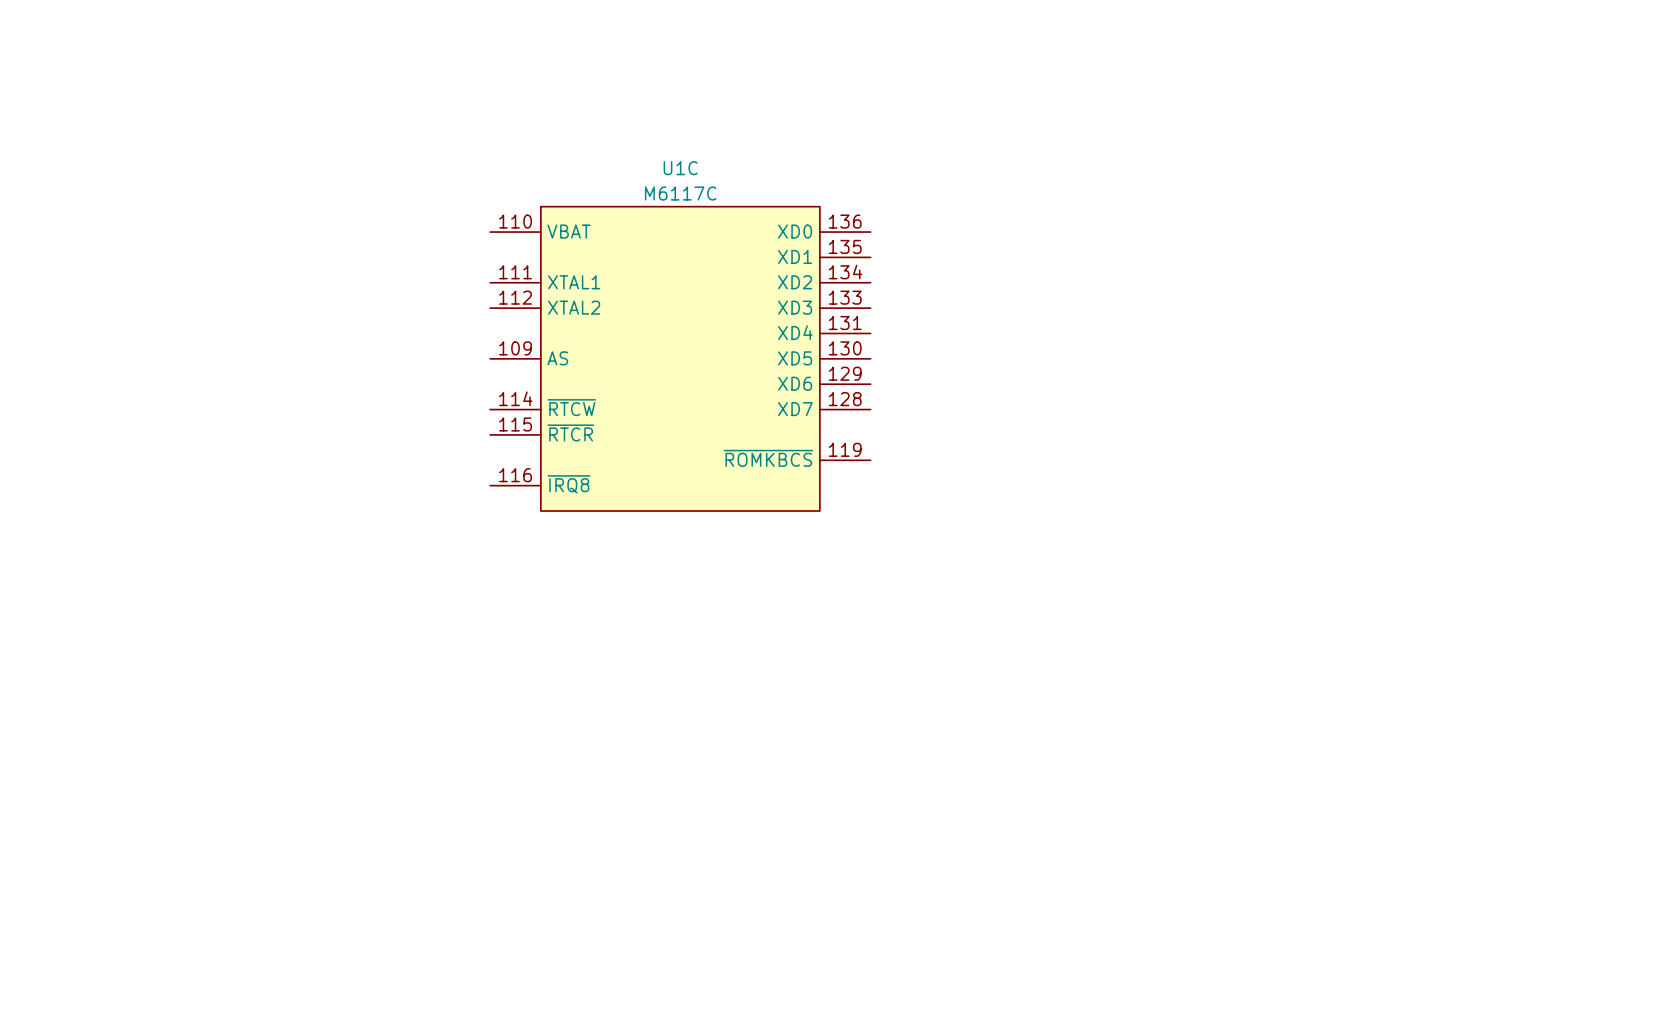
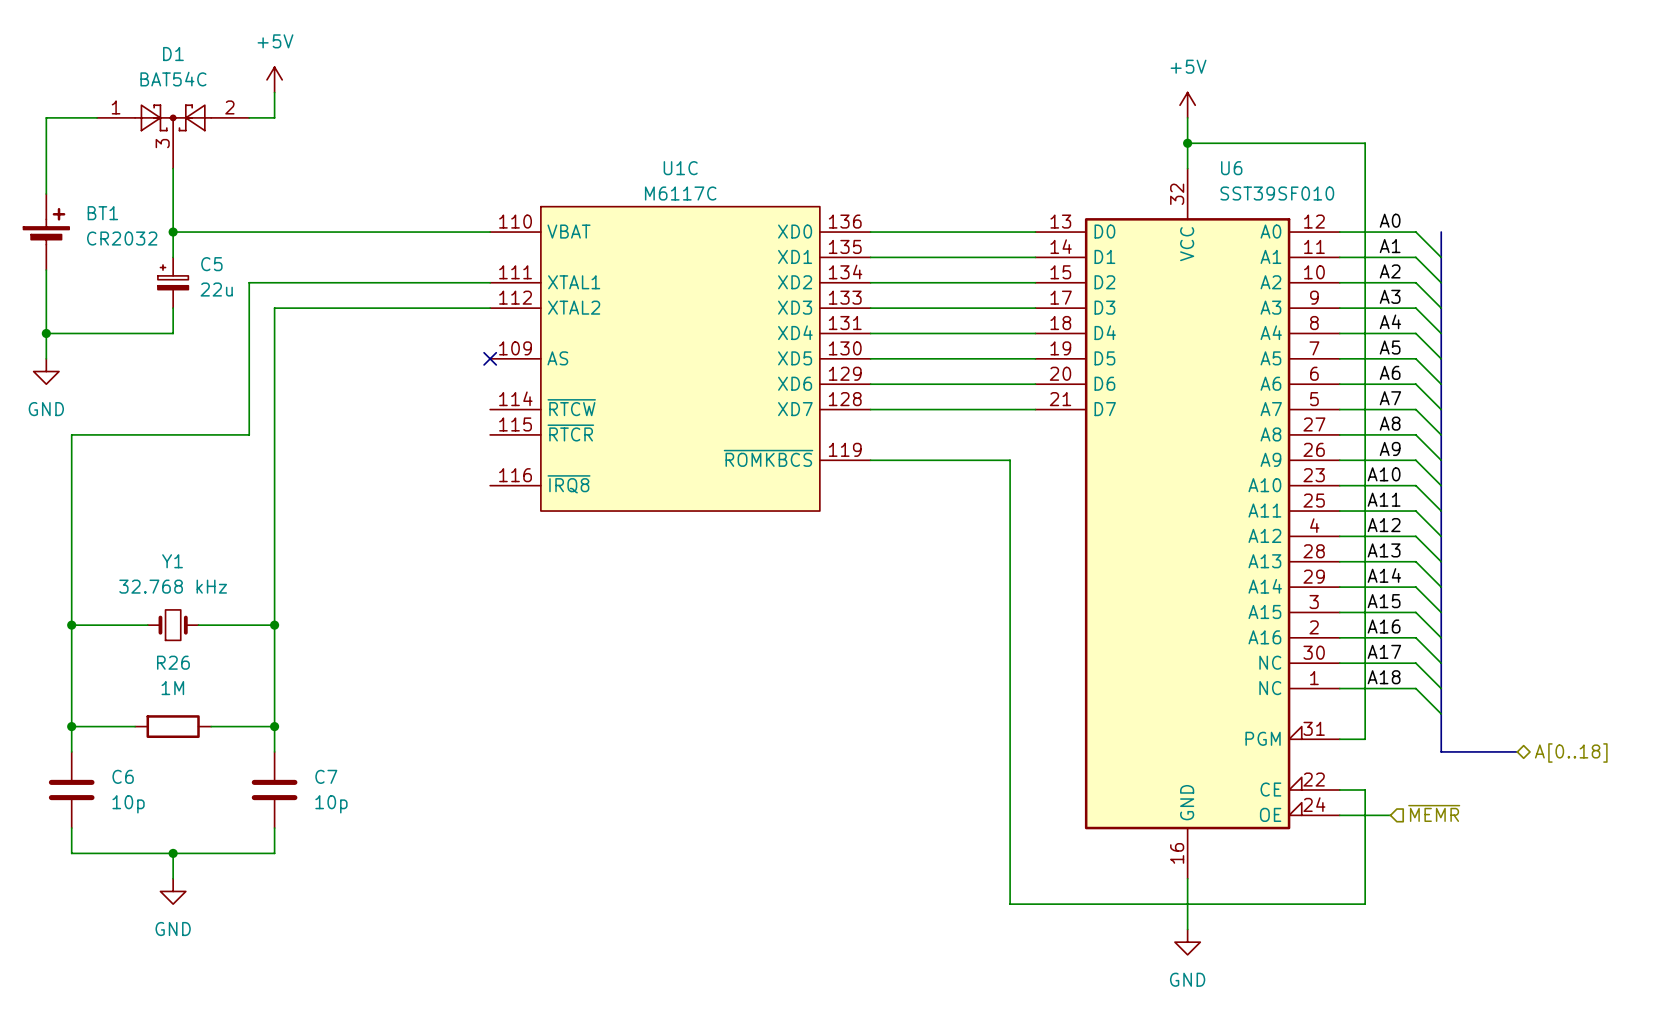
power symbol: none -> +5V (274, 79)
wire: none -> (274, 92) (274, 117) (249, 117)
power symbol: none -> +5V (1187, 105)
wire: none -> (97, 117) (46, 117) (46, 193)
wire: none -> (1187, 117) (1187, 168)
D1: none -> BAT54C (173, 136)
wire: none -> (1187, 143) (1365, 143) (1365, 739) (1339, 739)
junction: none -> (1187, 143)
wire: none -> (173, 168) (173, 257)
label: none -> A0 (1390, 220)
BT1: none -> CR2032 (46, 232)
wire: none -> (173, 232) (490, 232)
junction: none -> (173, 232)
wire: none -> (870, 232) (1035, 232)
wire: none -> (1339, 232) (1415, 232) (1441, 257)
bus: none -> (1441, 232) (1441, 751) (1517, 751)
label: none -> A1 (1390, 246)
wire: none -> (870, 257) (1035, 257)
wire: none -> (1339, 257) (1415, 257) (1441, 282)
wire: none -> (46, 270) (46, 358)
label: none -> A2 (1390, 271)
C5: none -> 22u (173, 282)
wire: none -> (490, 282) (249, 282) (249, 434) (71, 434) (71, 751)
wire: none -> (870, 282) (1035, 282)
wire: none -> (1339, 282) (1415, 282) (1441, 308)
label: none -> A3 (1390, 296)
wire: none -> (173, 308) (173, 333) (46, 333)
wire: none -> (490, 308) (274, 308) (274, 751)
wire: none -> (870, 308) (1035, 308)
wire: none -> (1339, 308) (1415, 308) (1441, 333)
label: none -> A4 (1390, 321)
junction: none -> (46, 333)
wire: none -> (870, 333) (1035, 333)
wire: none -> (1339, 333) (1415, 333) (1441, 358)
label: none -> A5 (1390, 347)
no-connect mark: none -> (490, 358)
wire: none -> (870, 358) (1035, 358)
wire: none -> (1339, 358) (1415, 358) (1441, 384)
power symbol: none -> GND (46, 371)
label: none -> A6 (1390, 372)
wire: none -> (870, 384) (1035, 384)
wire: none -> (1339, 384) (1415, 384) (1441, 409)
label: none -> A7 (1390, 398)
wire: none -> (870, 409) (1035, 409)
wire: none -> (1339, 409) (1415, 409) (1441, 434)
label: none -> A8 (1390, 423)
wire: none -> (1339, 434) (1415, 434) (1441, 460)
label: none -> A9 (1390, 448)
wire: none -> (870, 460) (1010, 460) (1010, 904) (1365, 904) (1365, 790) (1339, 790)
wire: none -> (1339, 460) (1415, 460) (1441, 485)
label: none -> A10 (1384, 474)
wire: none -> (1339, 485) (1415, 485) (1441, 511)
label: none -> A11 (1384, 499)
wire: none -> (1339, 511) (1415, 511) (1441, 536)
U6: none -> SST39SF010 (1187, 523)
label: none -> A12 (1384, 525)
wire: none -> (1339, 536) (1415, 536) (1441, 561)
label: none -> A13 (1384, 550)
wire: none -> (1339, 561) (1415, 561) (1441, 587)
label: none -> A14 (1384, 575)
wire: none -> (1339, 587) (1415, 587) (1441, 612)
label: none -> A15 (1384, 601)
wire: none -> (1339, 612) (1415, 612) (1441, 637)
wire: none -> (71, 625) (147, 625)
junction: none -> (71, 625)
Y1: none -> 32.768 kHz (173, 625)
wire: none -> (198, 625) (274, 625)
junction: none -> (274, 625)
label: none -> A16 (1384, 626)
wire: none -> (1339, 637) (1415, 637) (1441, 663)
label: none -> A17 (1384, 651)
wire: none -> (1339, 663) (1415, 663) (1441, 688)
label: none -> A18 (1384, 677)
wire: none -> (1339, 688) (1415, 688) (1441, 713)
wire: none -> (71, 726) (135, 726)
junction: none -> (71, 726)
R26: none -> 1M (173, 726)
wire: none -> (211, 726) (274, 726)
junction: none -> (274, 726)
hierarchical label: none -> A[0..18] (1571, 752)
C6: none -> 10p (71, 790)
C7: none -> 10p (274, 790)
hierarchical label: none -> ~{MEMR} (1434, 813)
wire: none -> (1339, 815) (1390, 815)
wire: none -> (71, 828) (71, 853) (274, 853) (274, 828)
wire: none -> (173, 853) (173, 878)
junction: none -> (173, 853)
wire: none -> (1187, 878) (1187, 929)
power symbol: none -> GND (173, 891)
power symbol: none -> GND (1187, 942)

